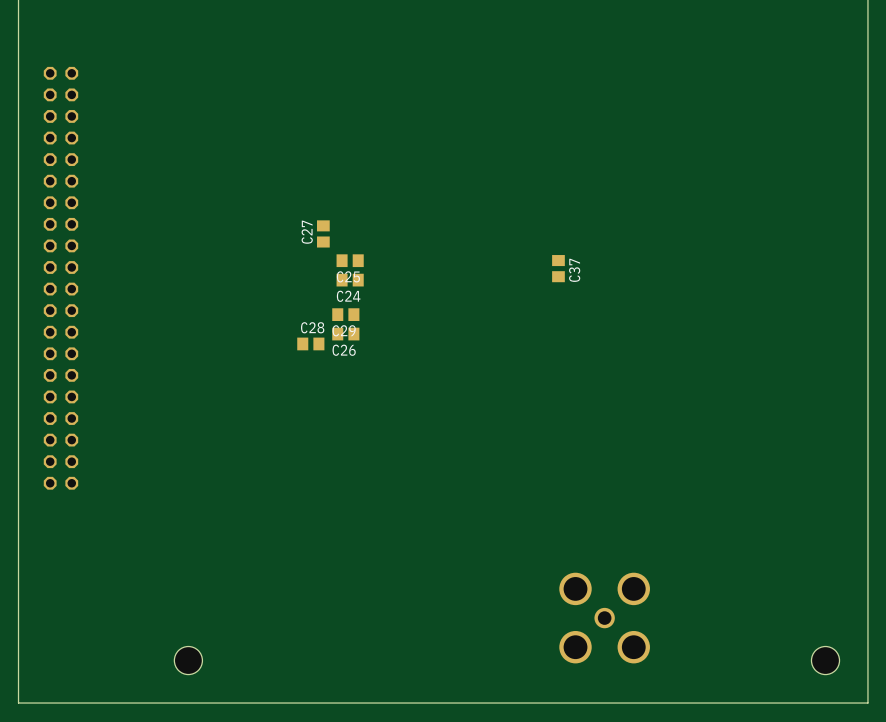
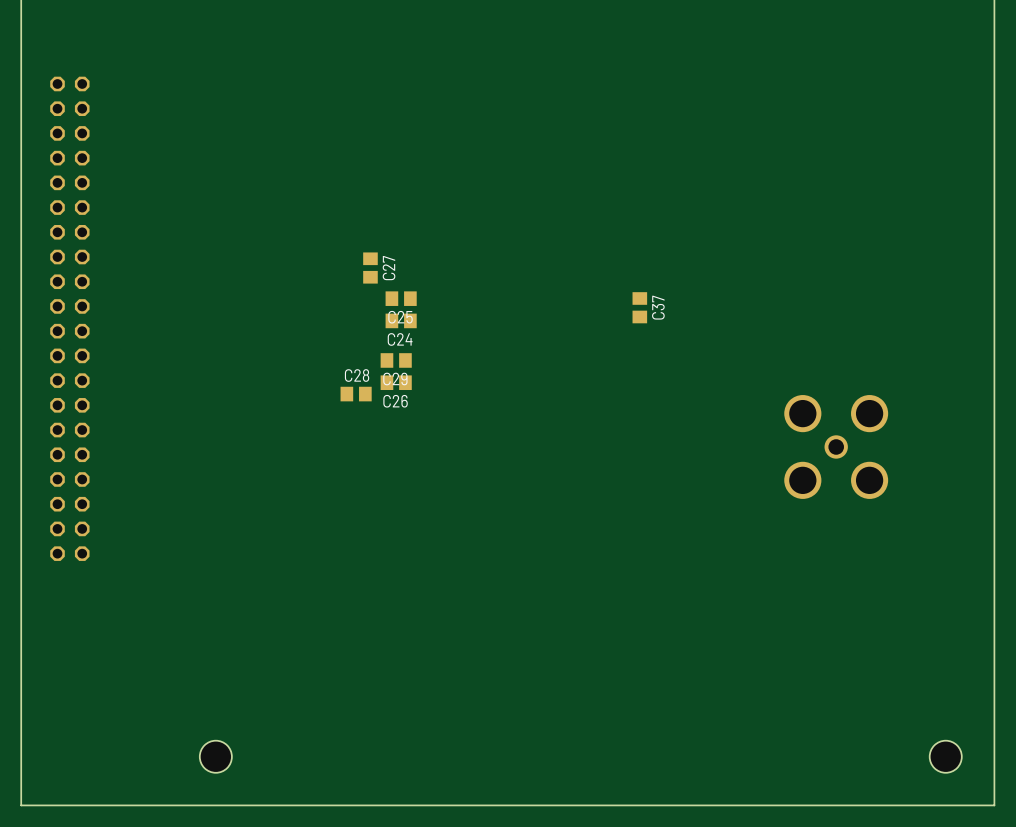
C27 name position: C27 (307, 232) -> C27 (389, 268)
part: none -> (836, 446)
part: (604, 618) -> none

